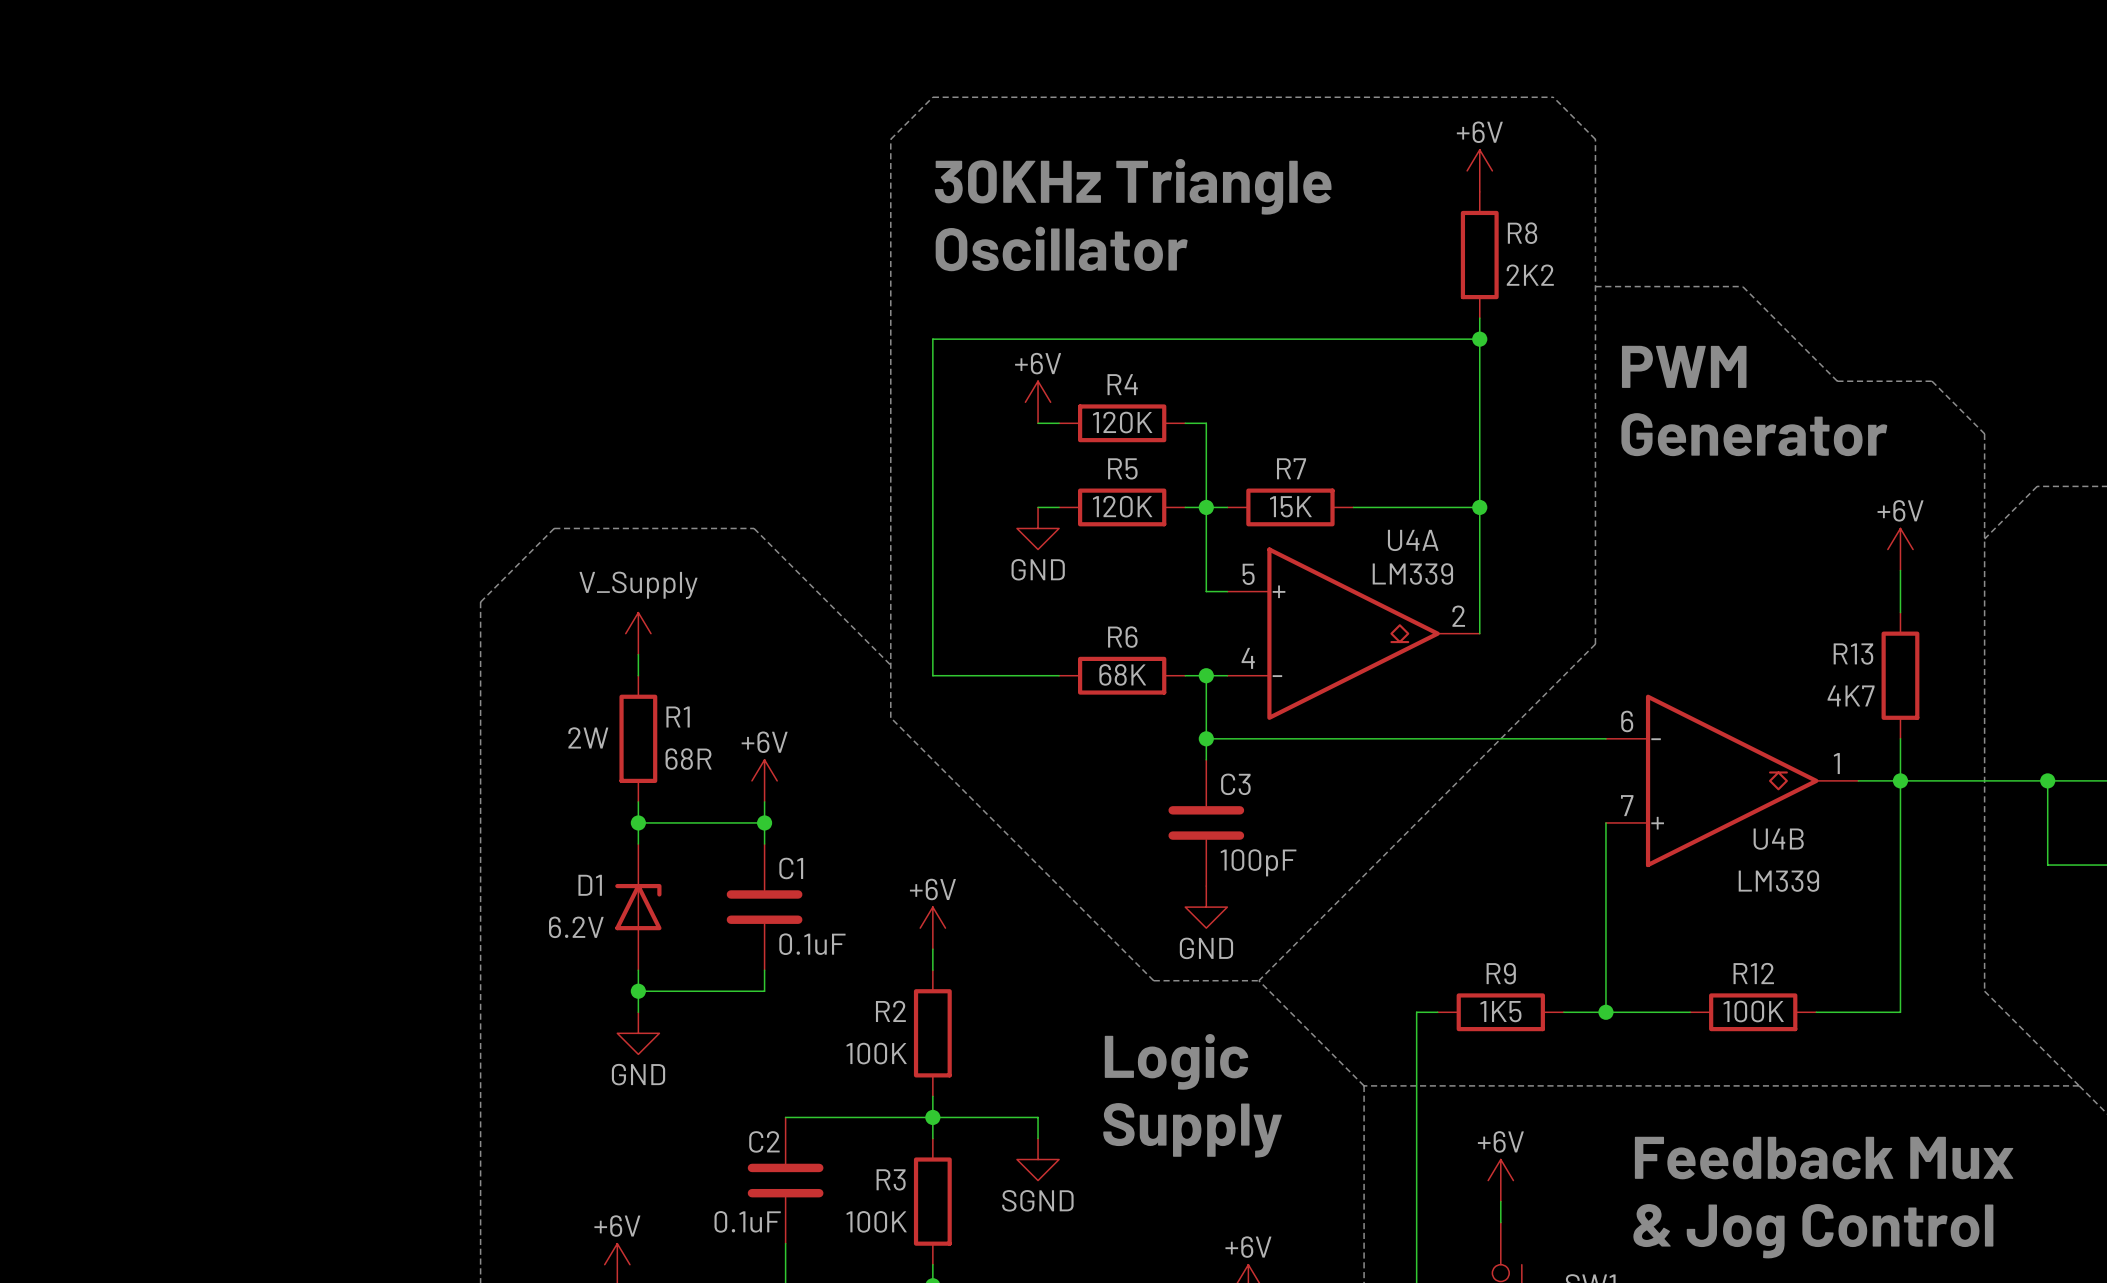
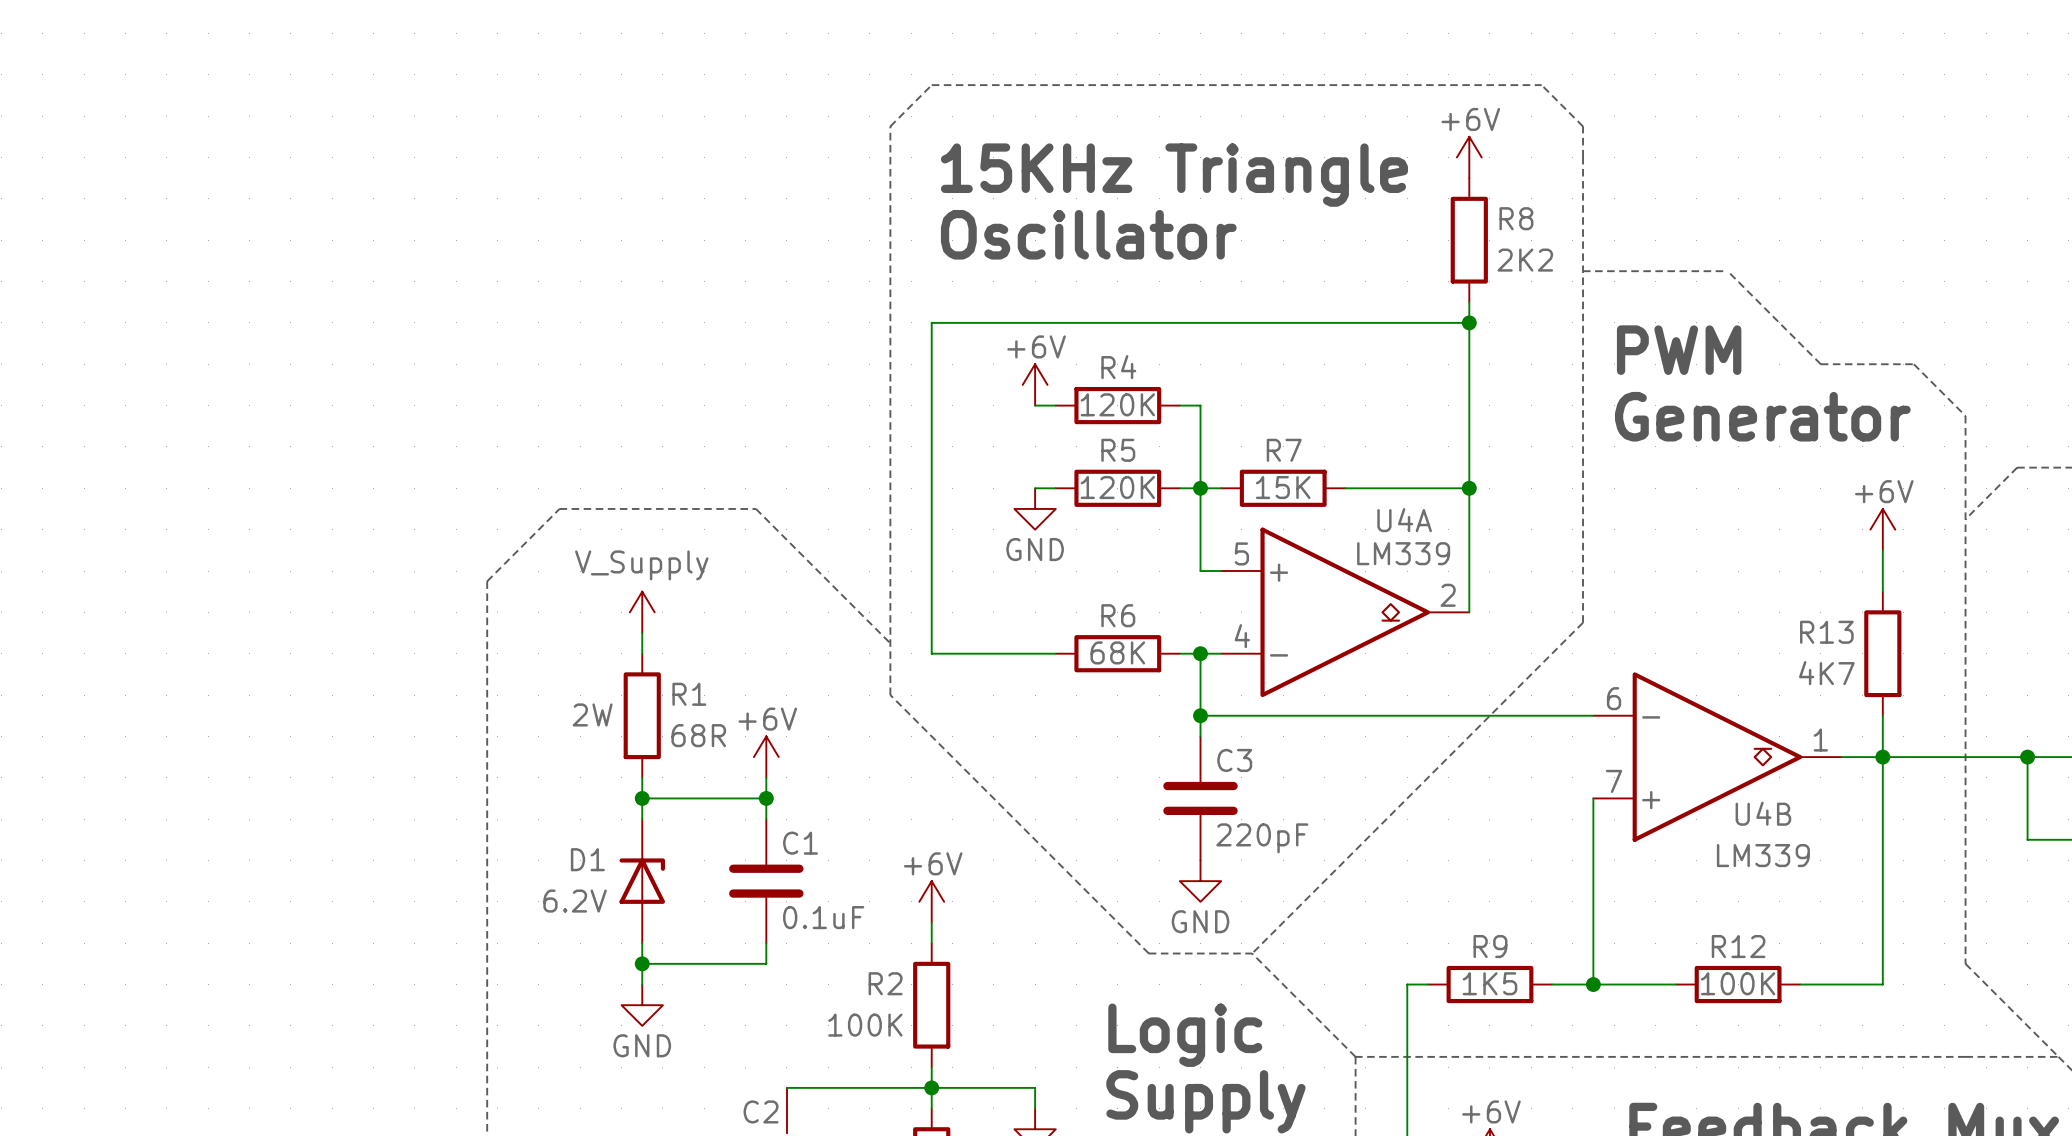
text: 30KHz Triangle (1133, 186) -> 15KHz Triangle (1174, 175)
C3 value: 100pF (1258, 862) -> 220pF (1262, 838)

